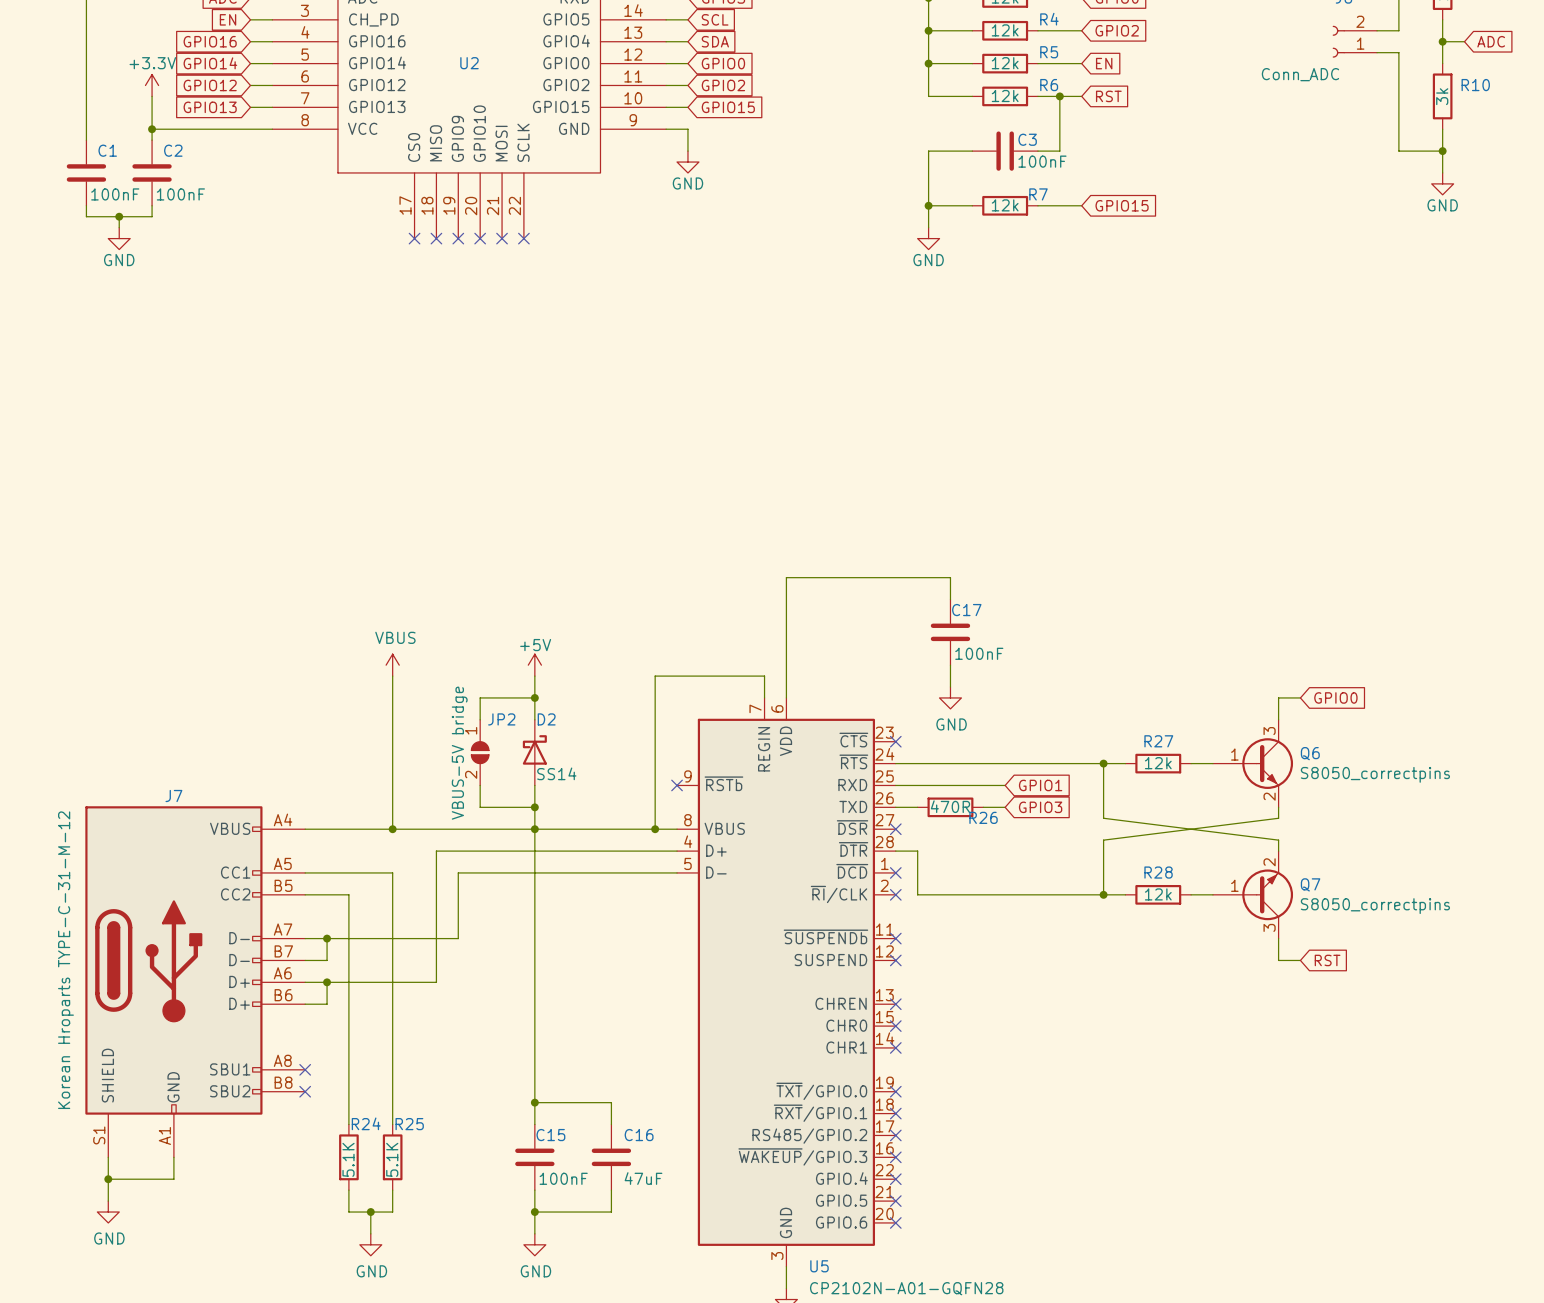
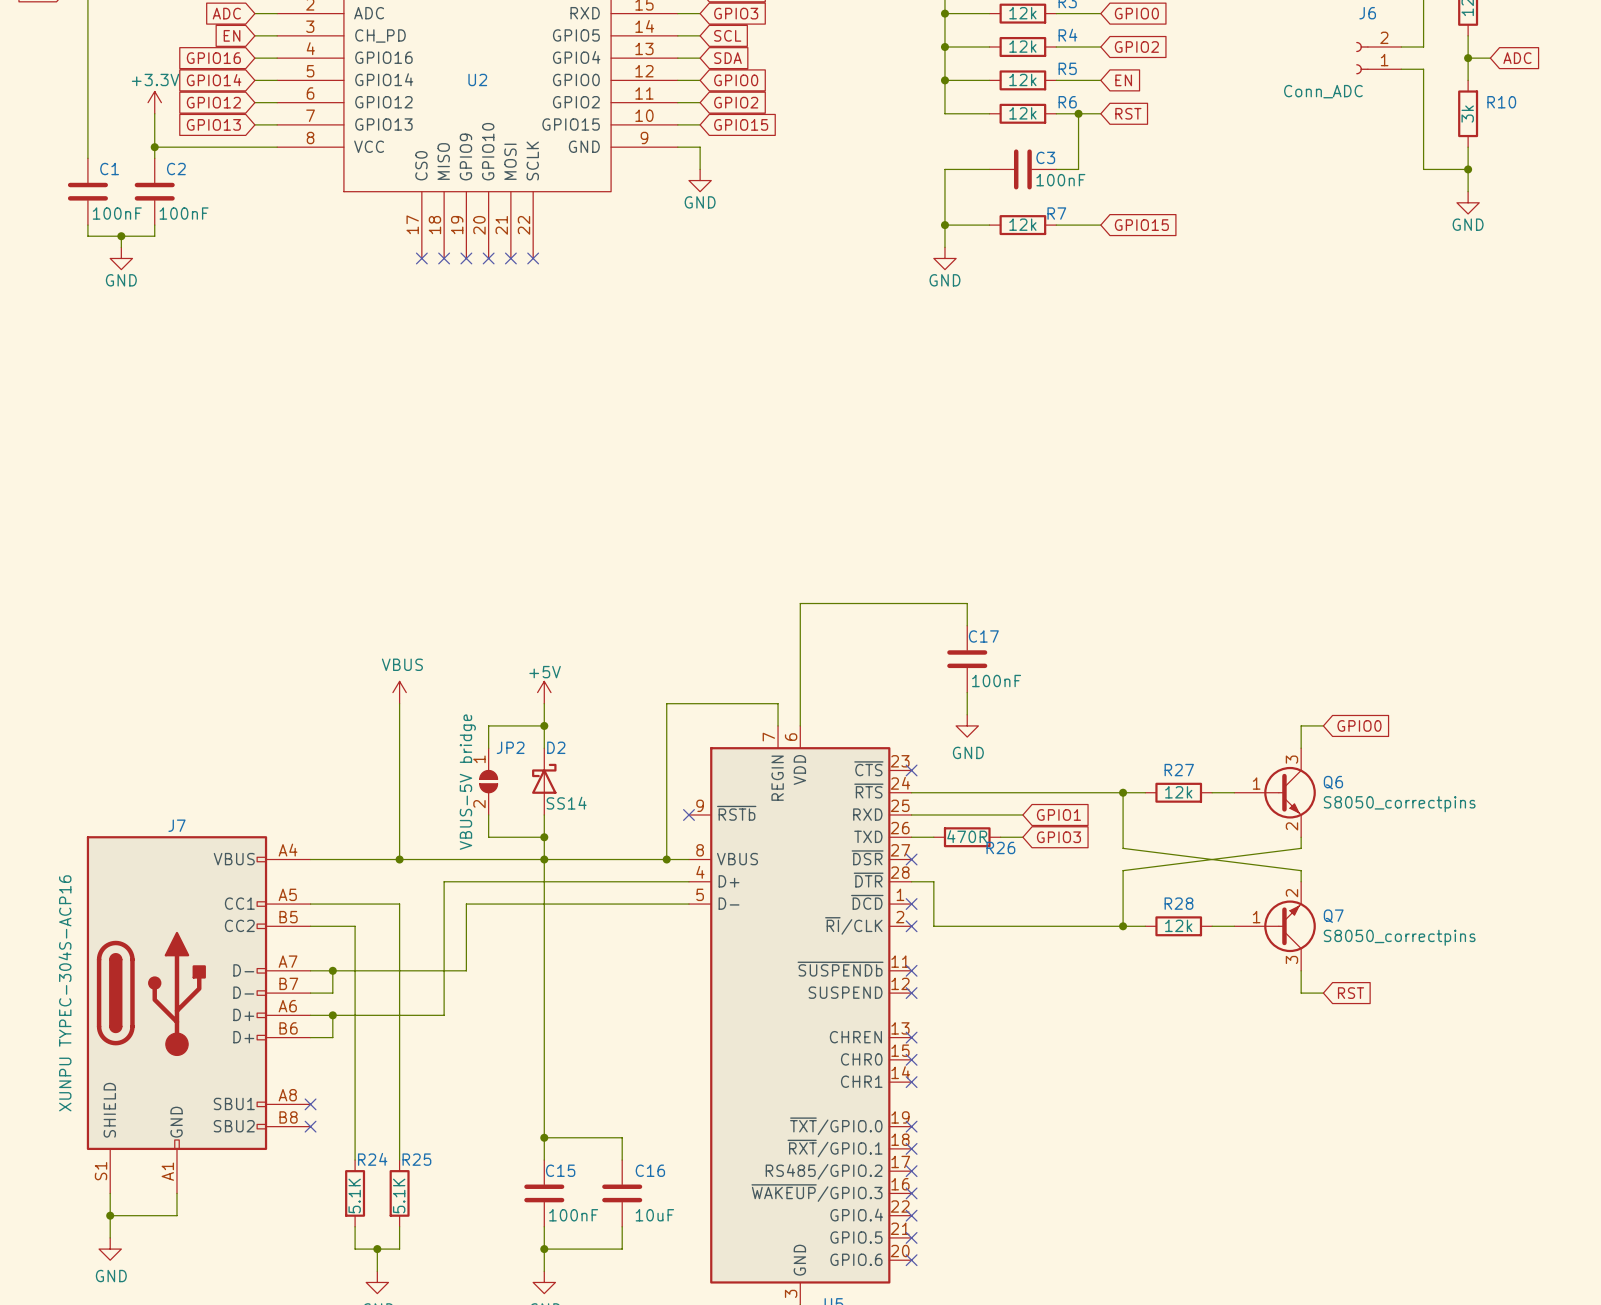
J7 value: Korean Hroparts TYPE-C-31-M-12 (65, 960) -> XUNPU TYPEC-304S-ACP16 (65, 993)
C16 value: 47uF (643, 1178) -> 10uF (654, 1215)

